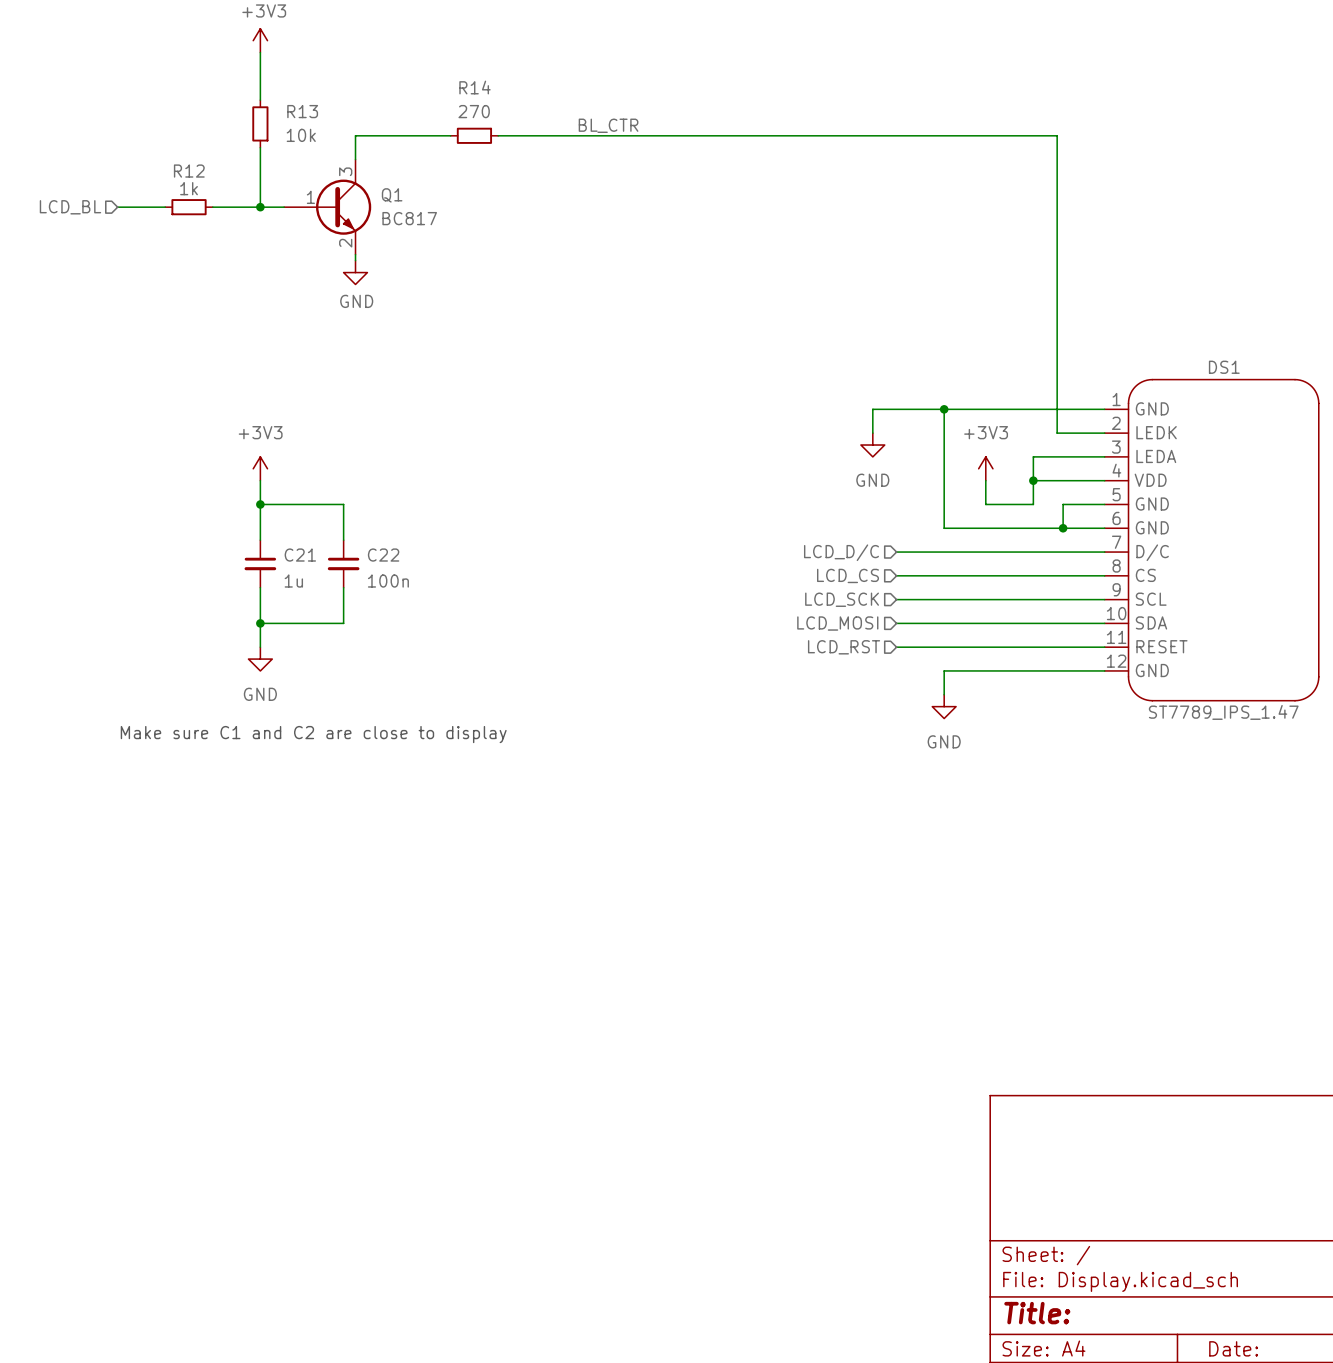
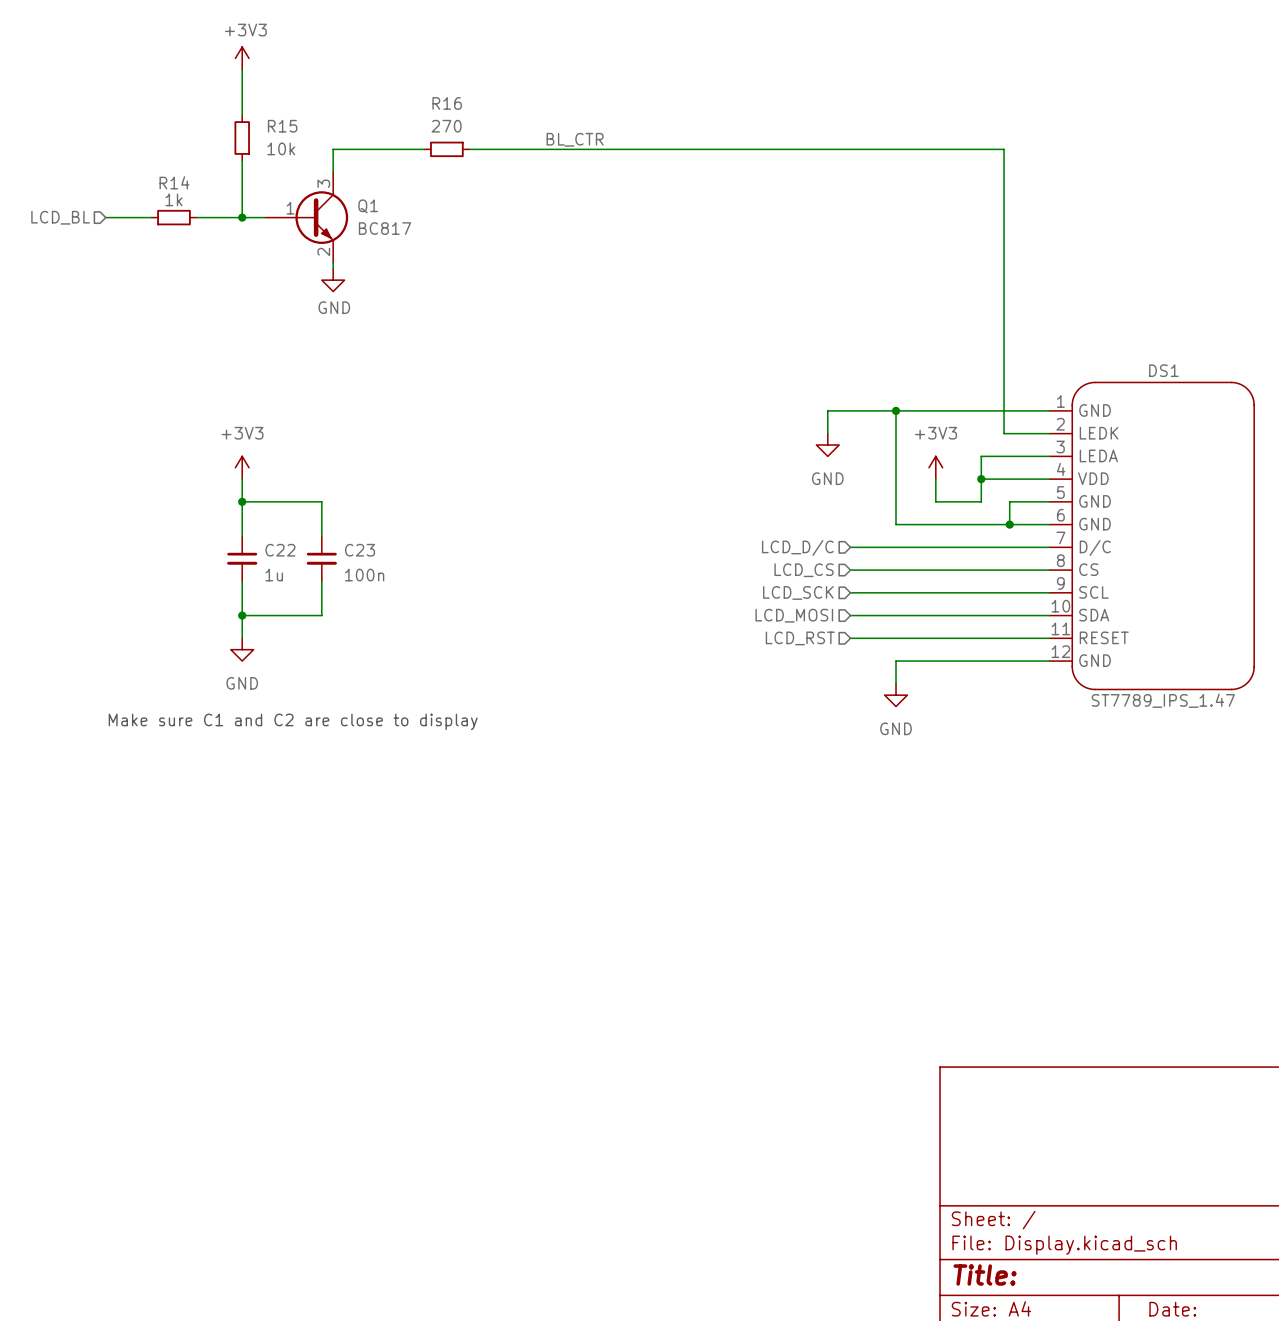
R14 name: R14 (475, 87) -> R16 (447, 103)
R13 name: R13 (302, 111) -> R15 (282, 126)
R12 name: R12 (189, 171) -> R14 (174, 182)
C21 name: C21 (300, 555) -> C22 (280, 550)
C22 name: C22 (383, 555) -> C23 (360, 550)

